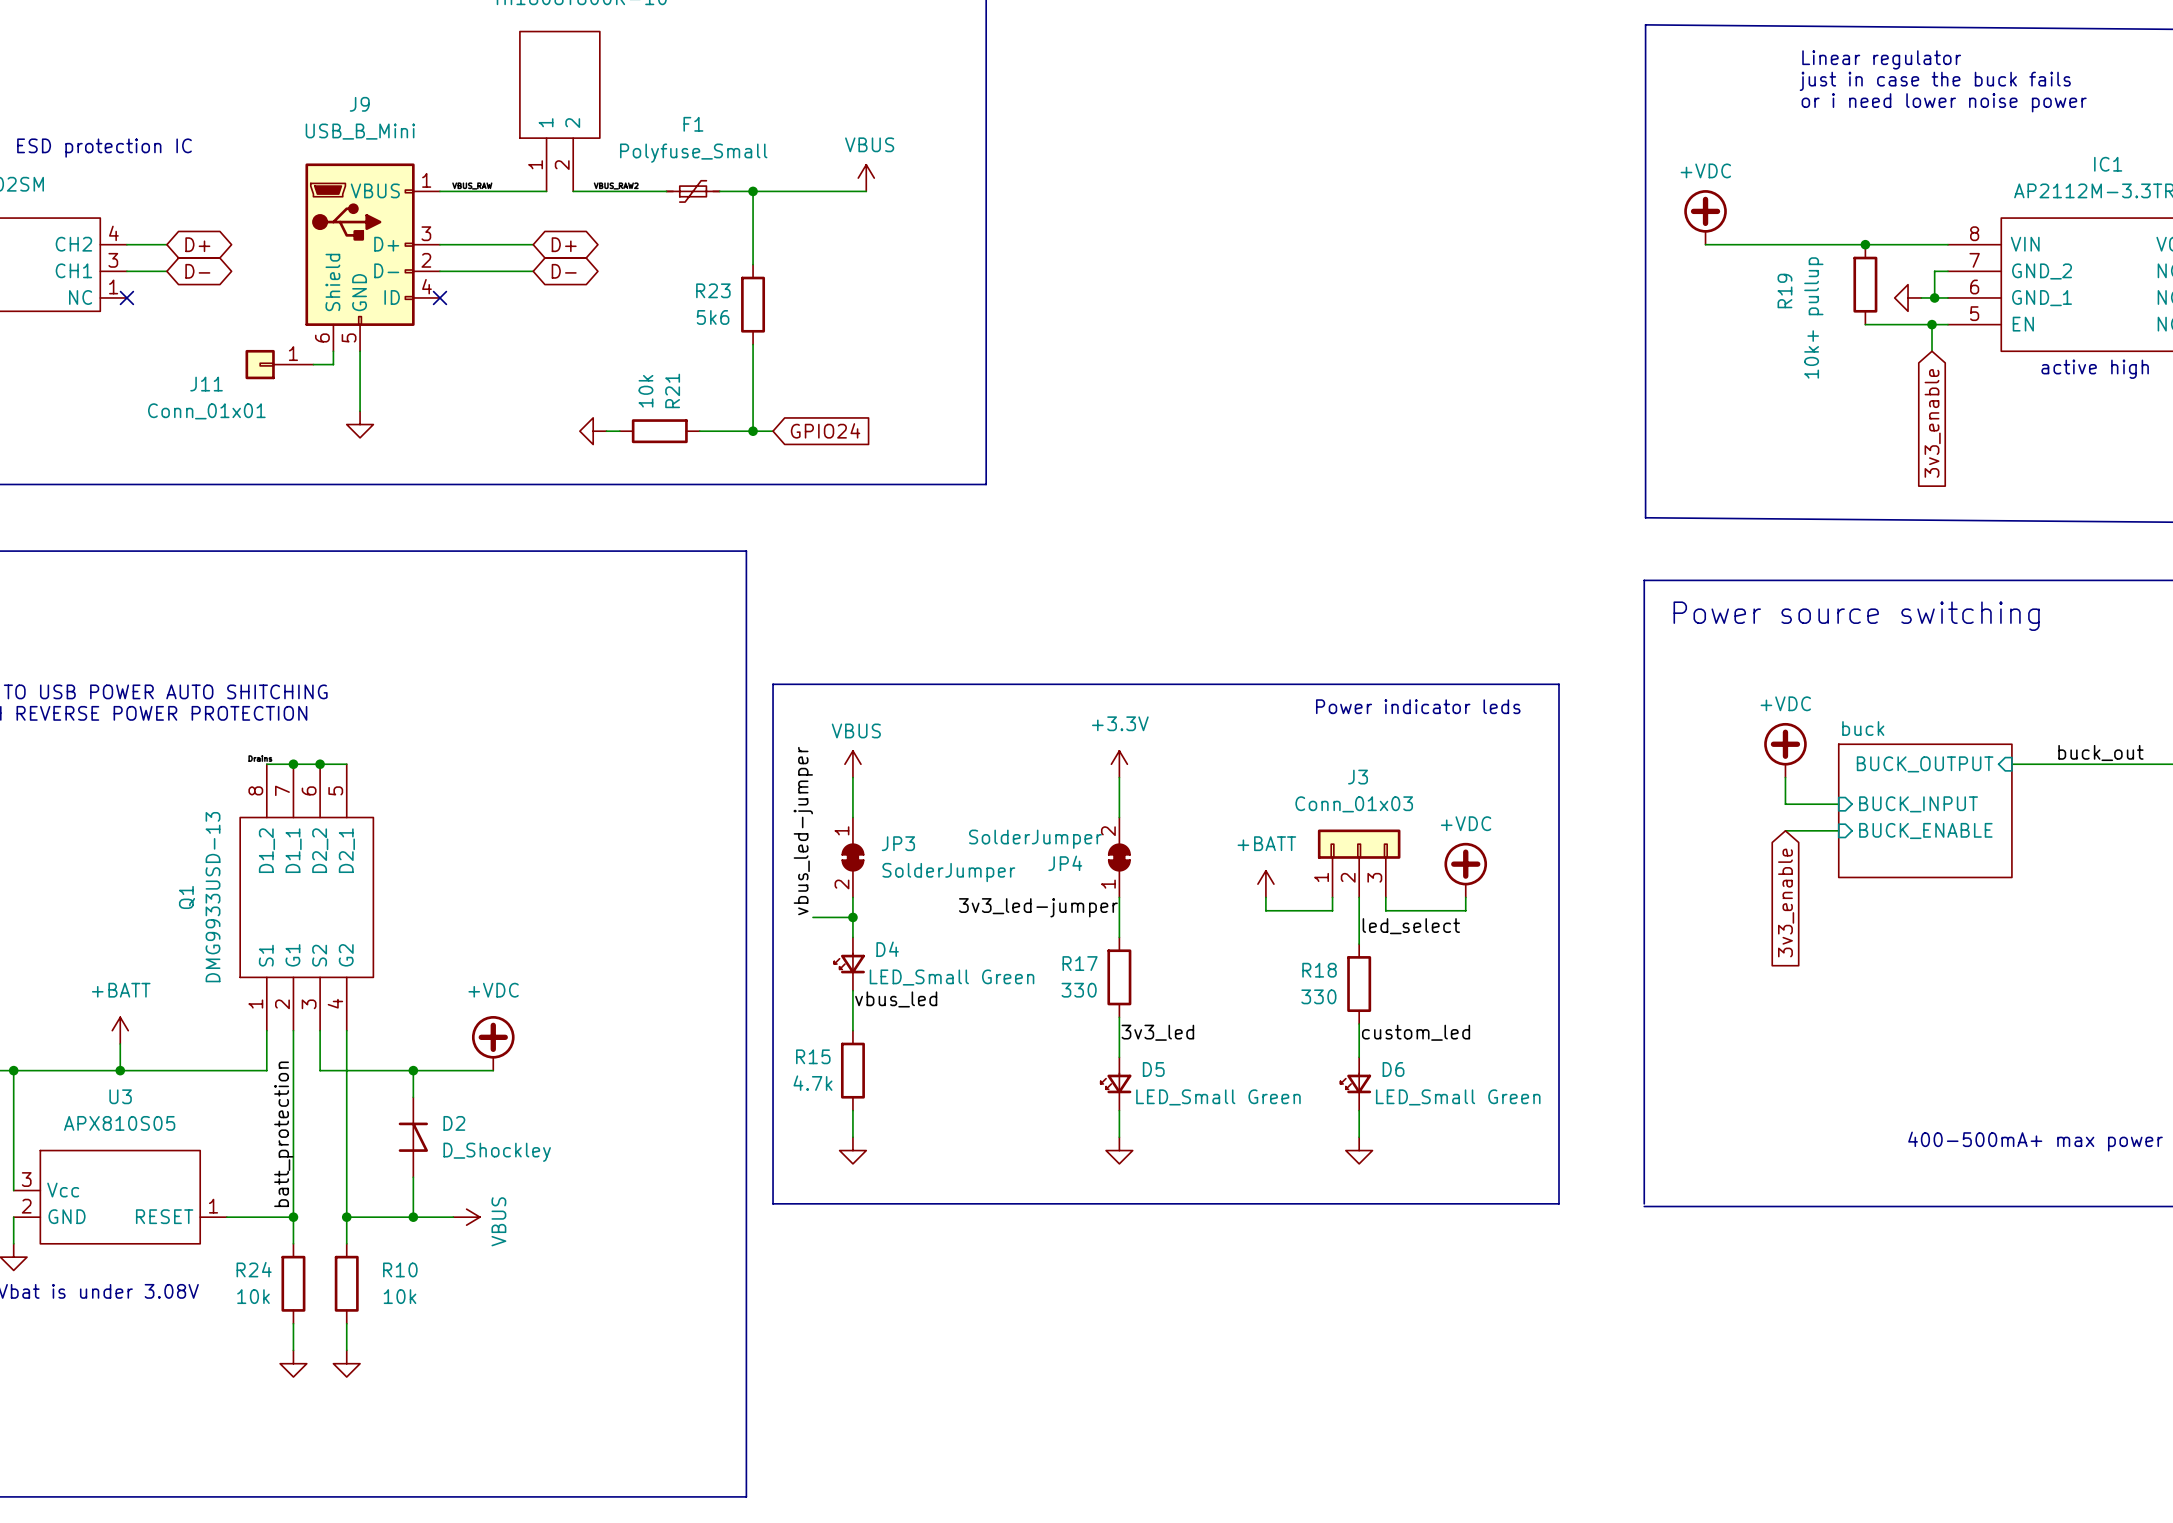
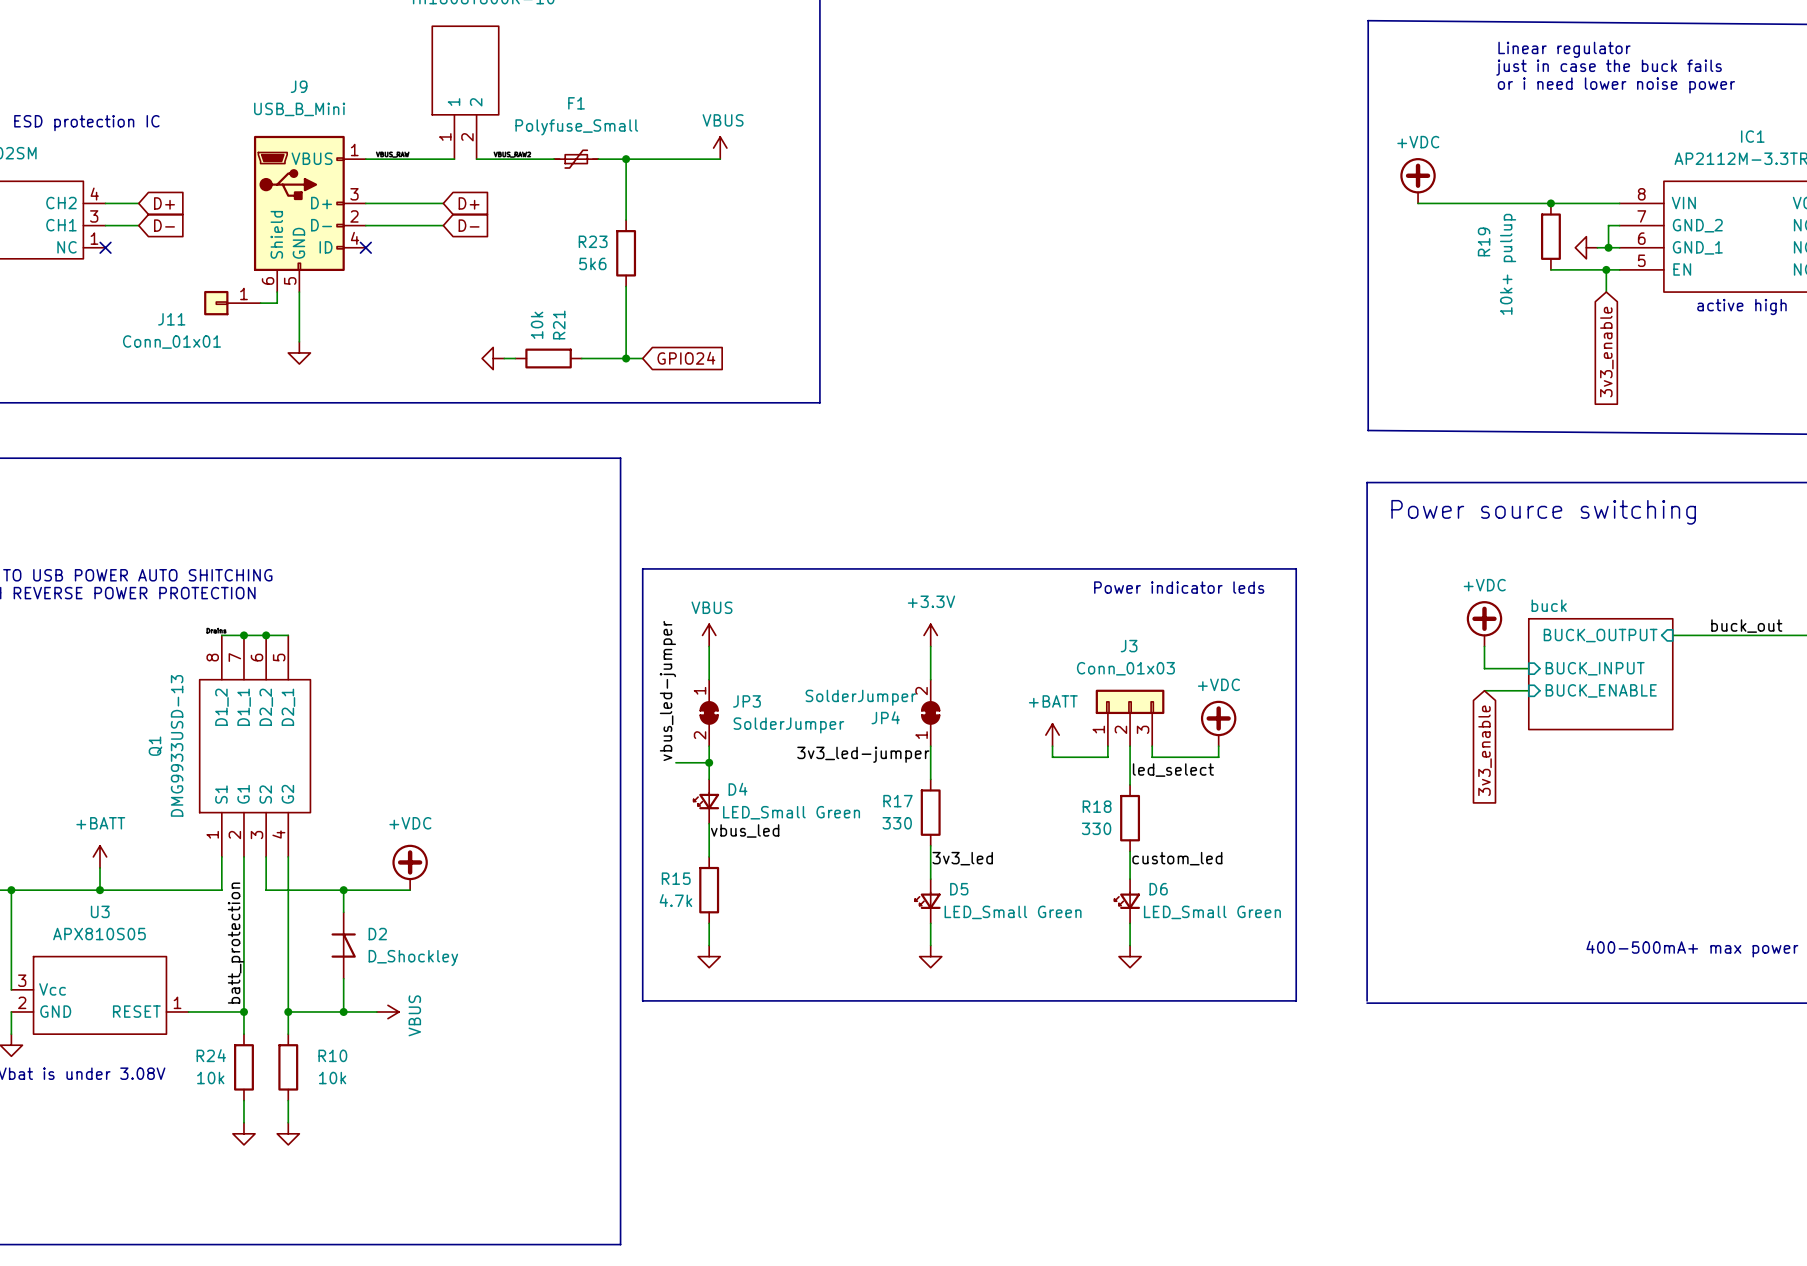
global label shape: bidirectional (197, 244) -> input (164, 203)
global label shape: bidirectional (564, 244) -> input (469, 203)
global label shape: bidirectional (197, 271) -> input (164, 225)
global label shape: bidirectional (564, 271) -> input (469, 225)

